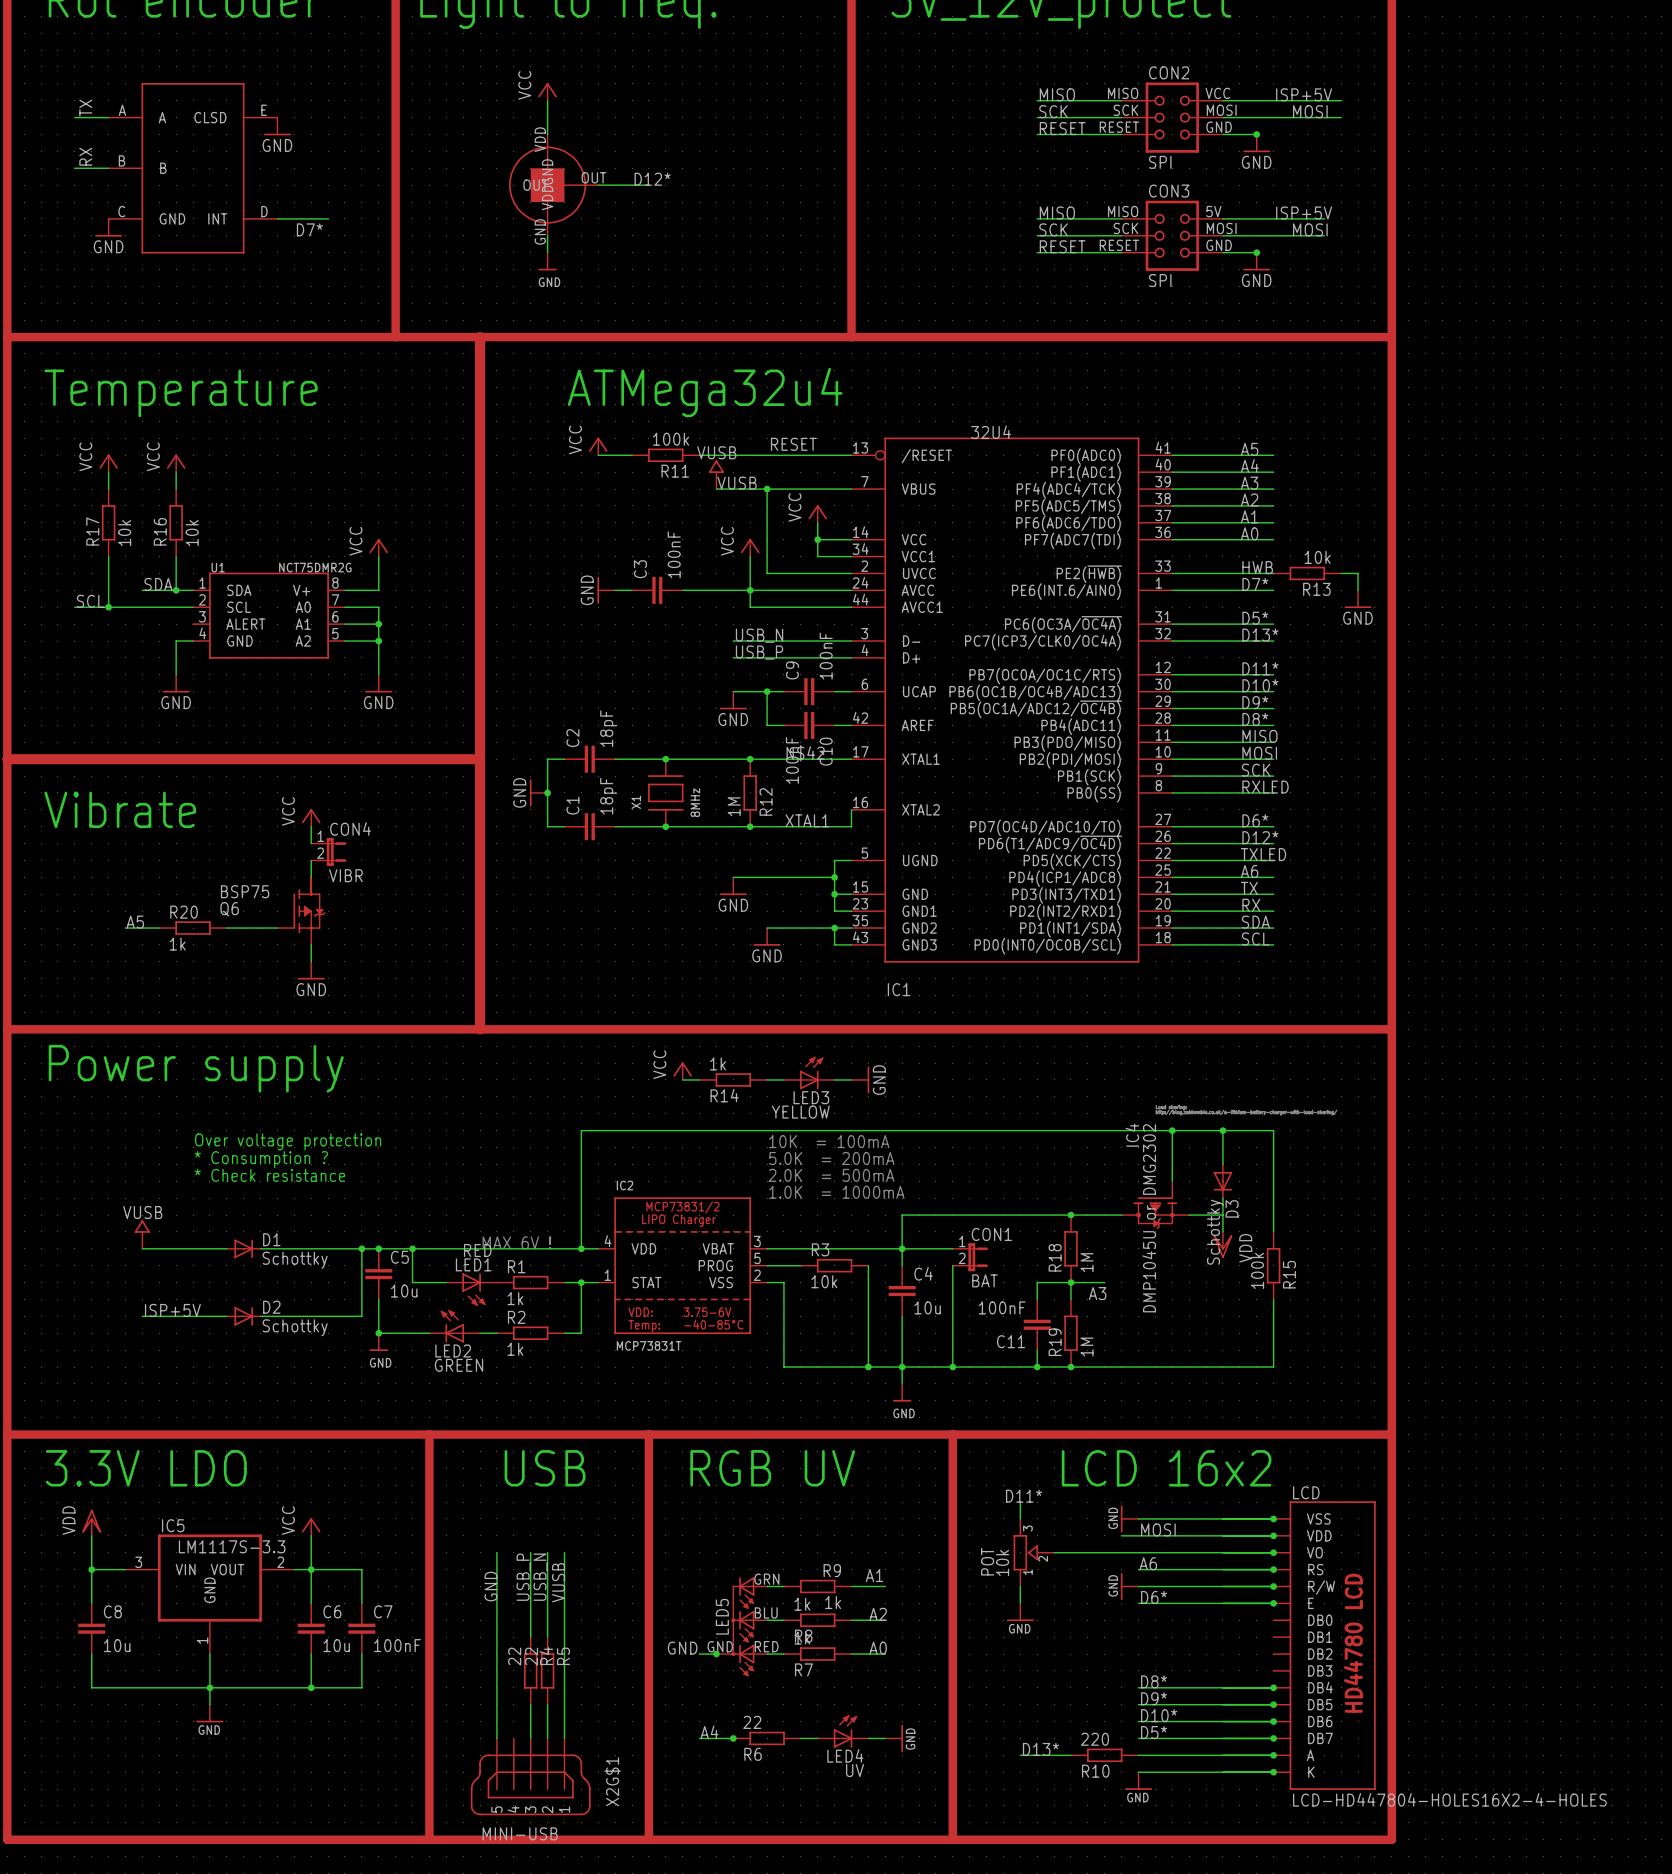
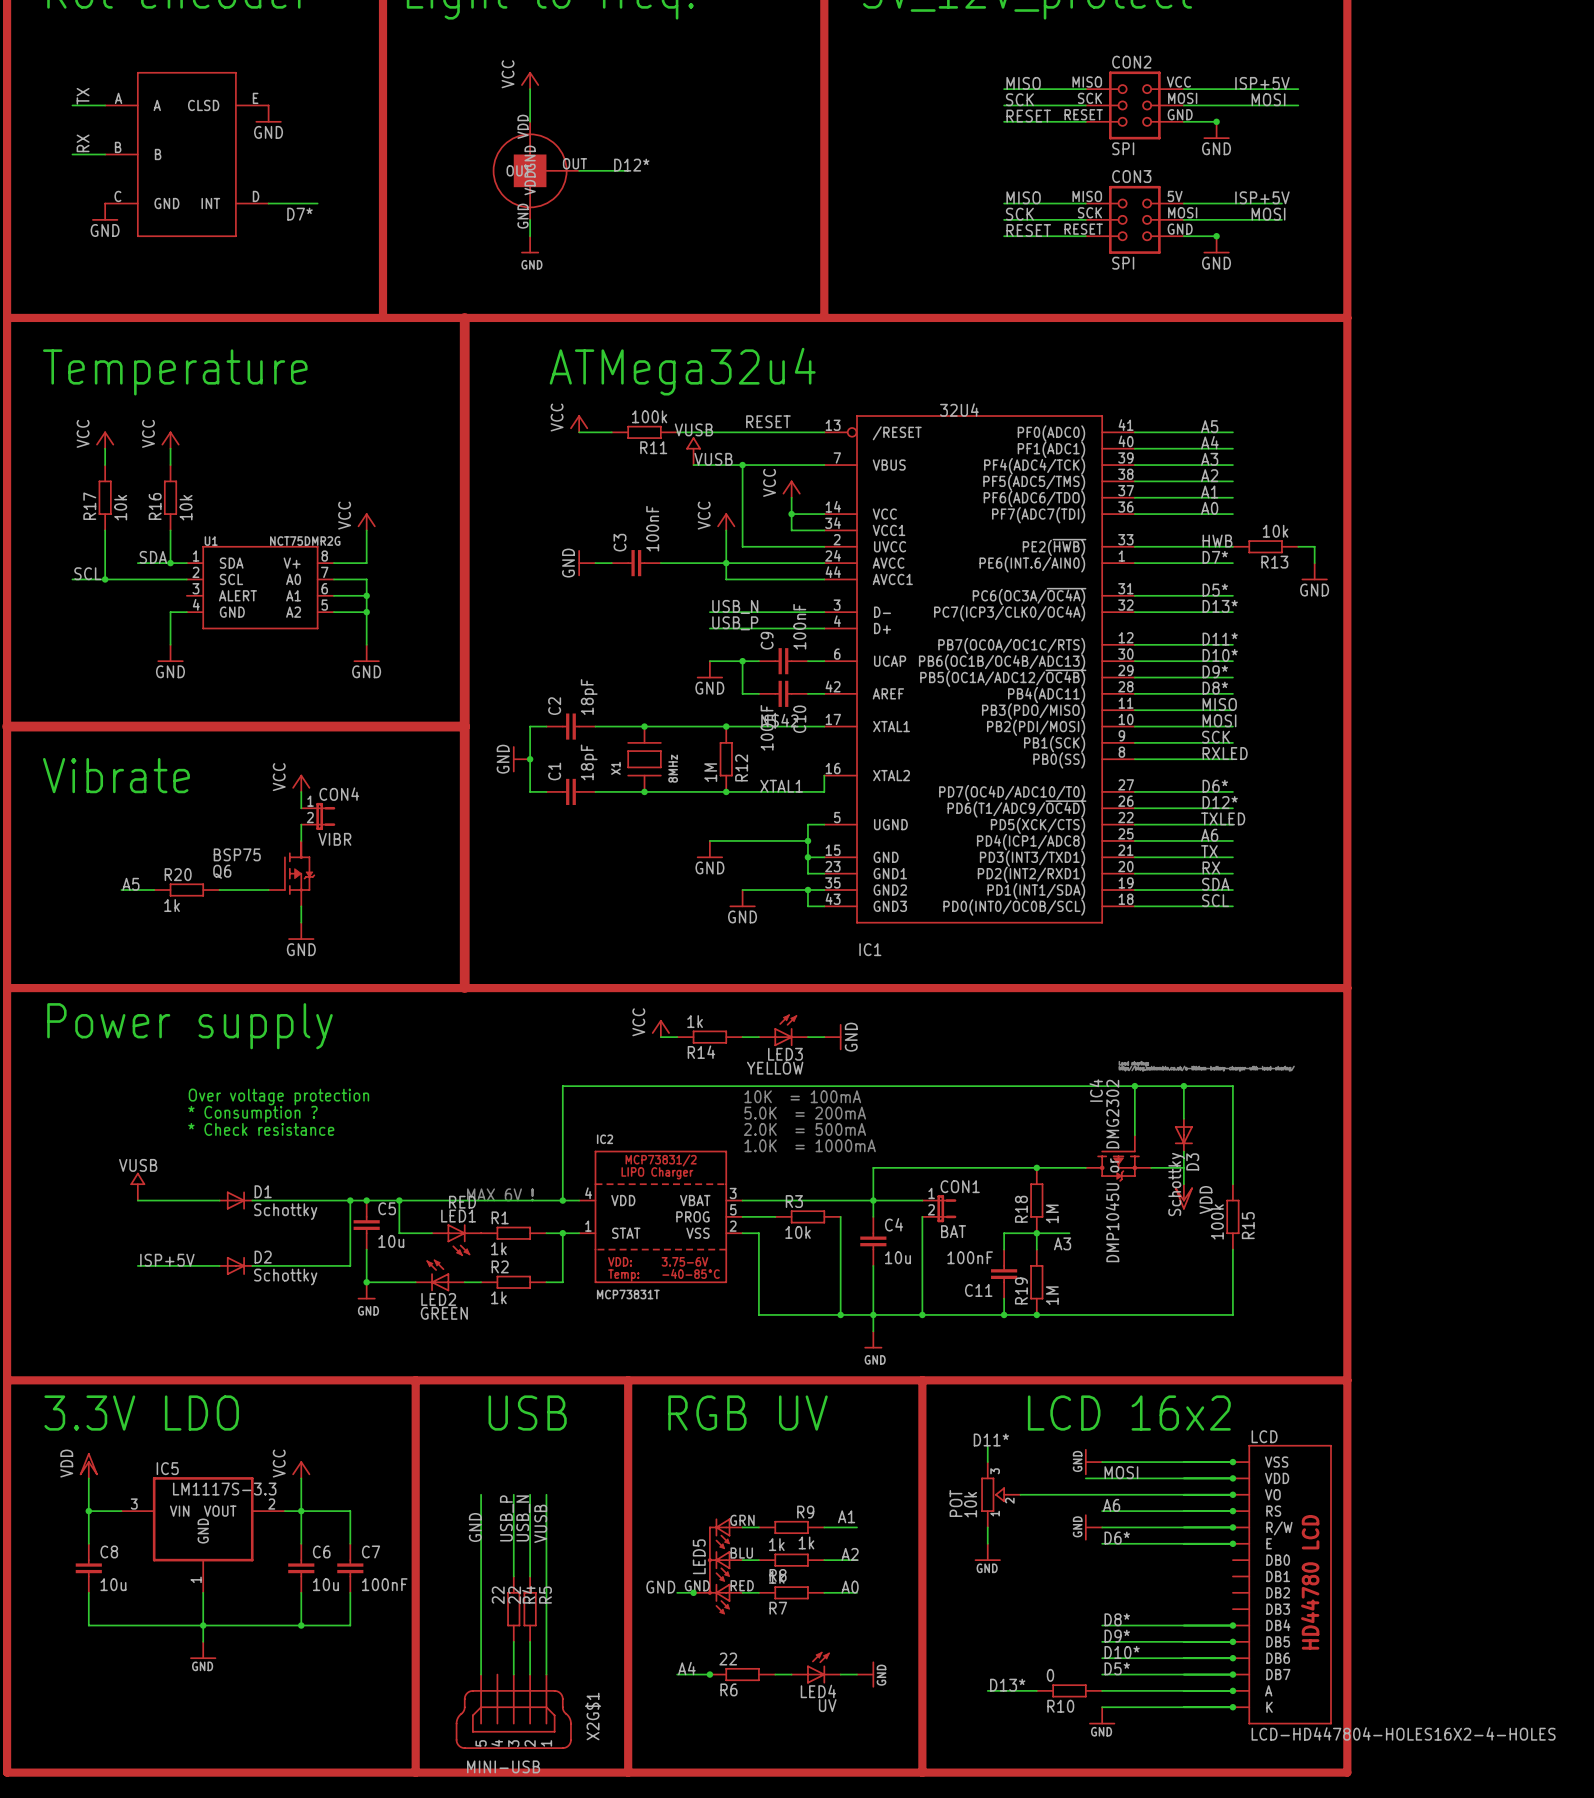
R10 value: 220 (1095, 1739) -> 0 (1050, 1675)

